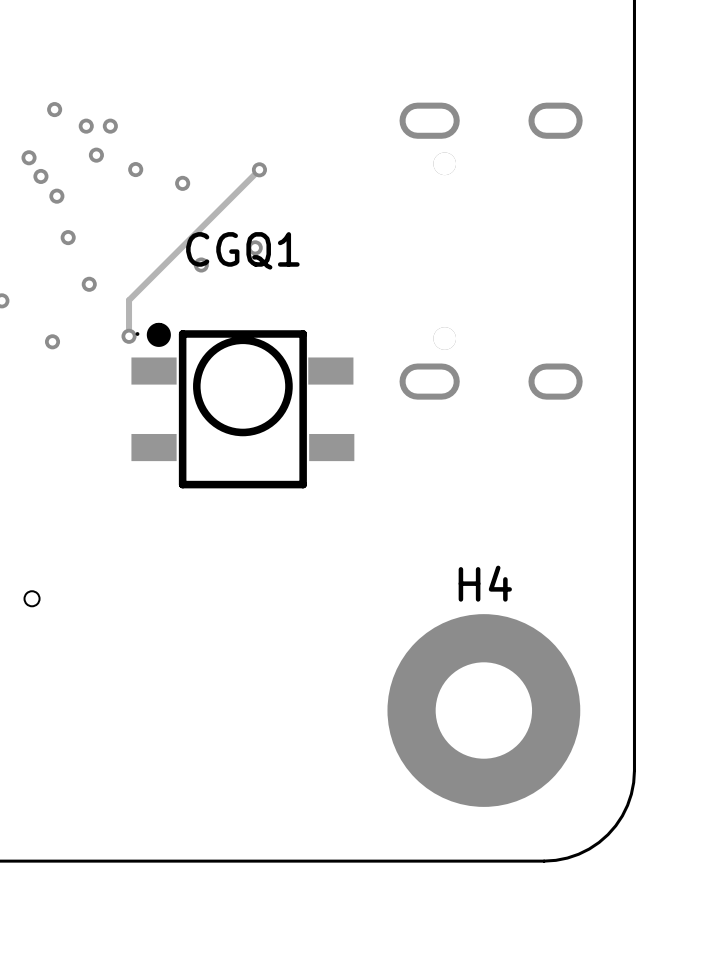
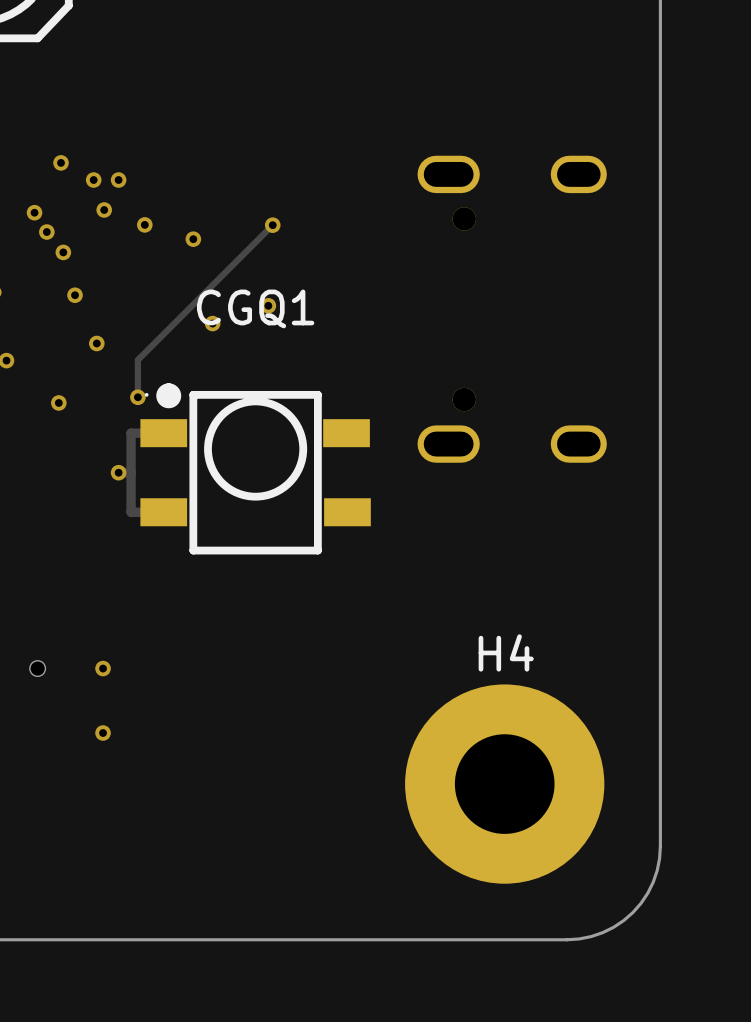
track: none -> (163, 433) (131, 433) (131, 512) (163, 512)
via: none -> (118, 472)
via: none -> (103, 668)
via: none -> (103, 733)

